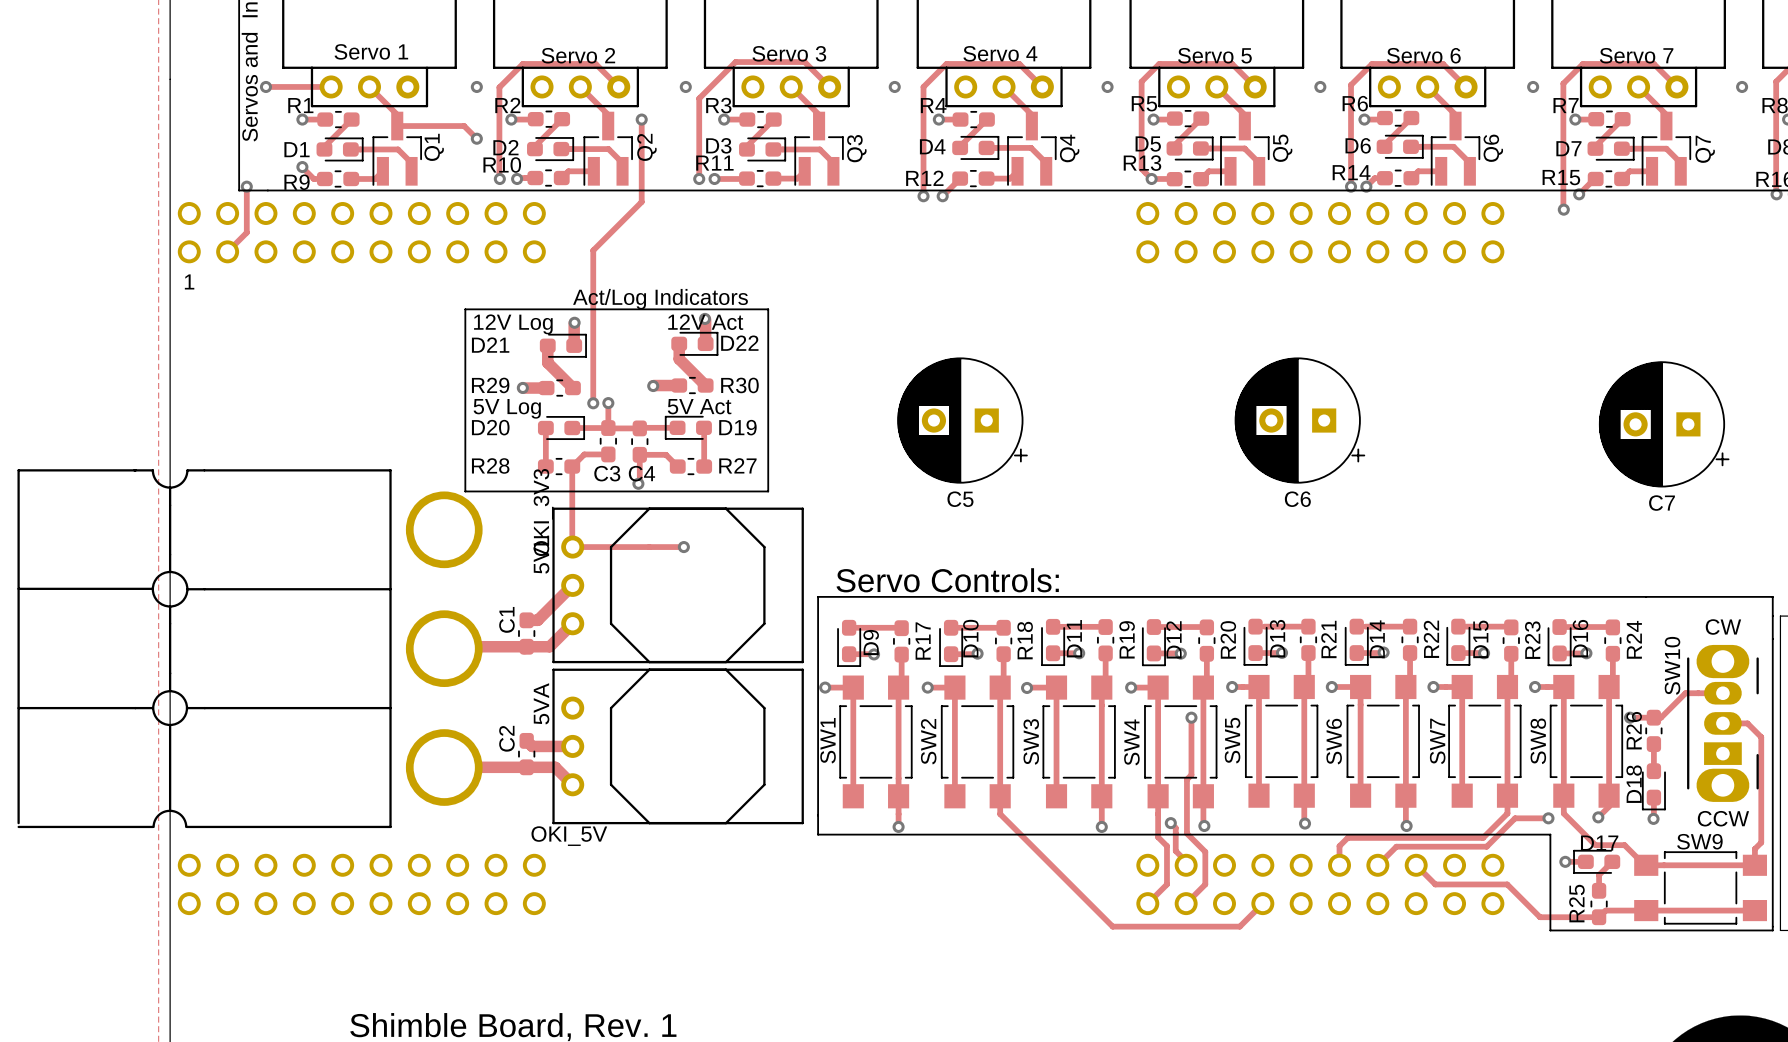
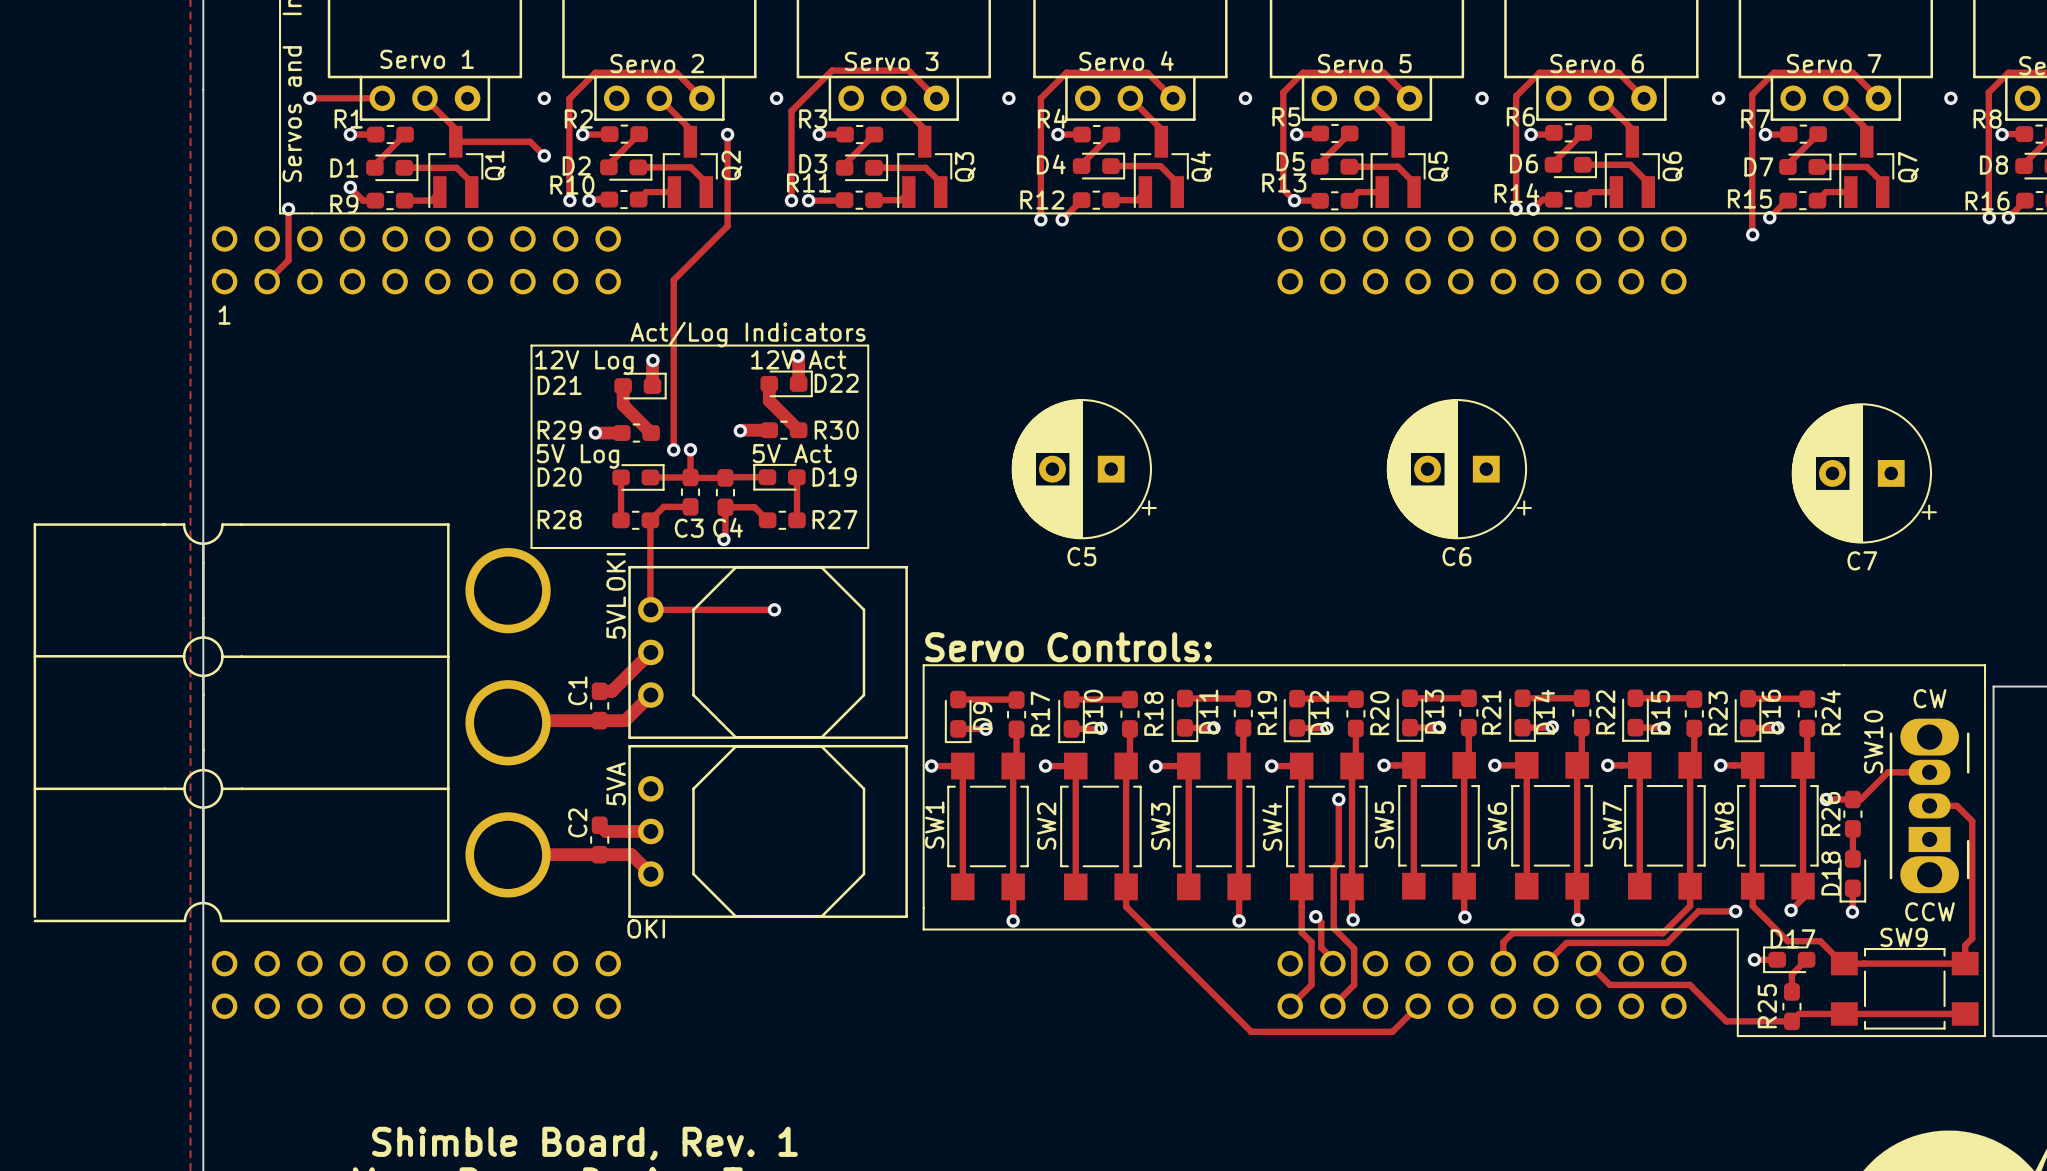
part value: OKI_3V3 (543, 512) -> OKI (616, 571)
part value: OKI_5V (569, 836) -> OKI (646, 928)

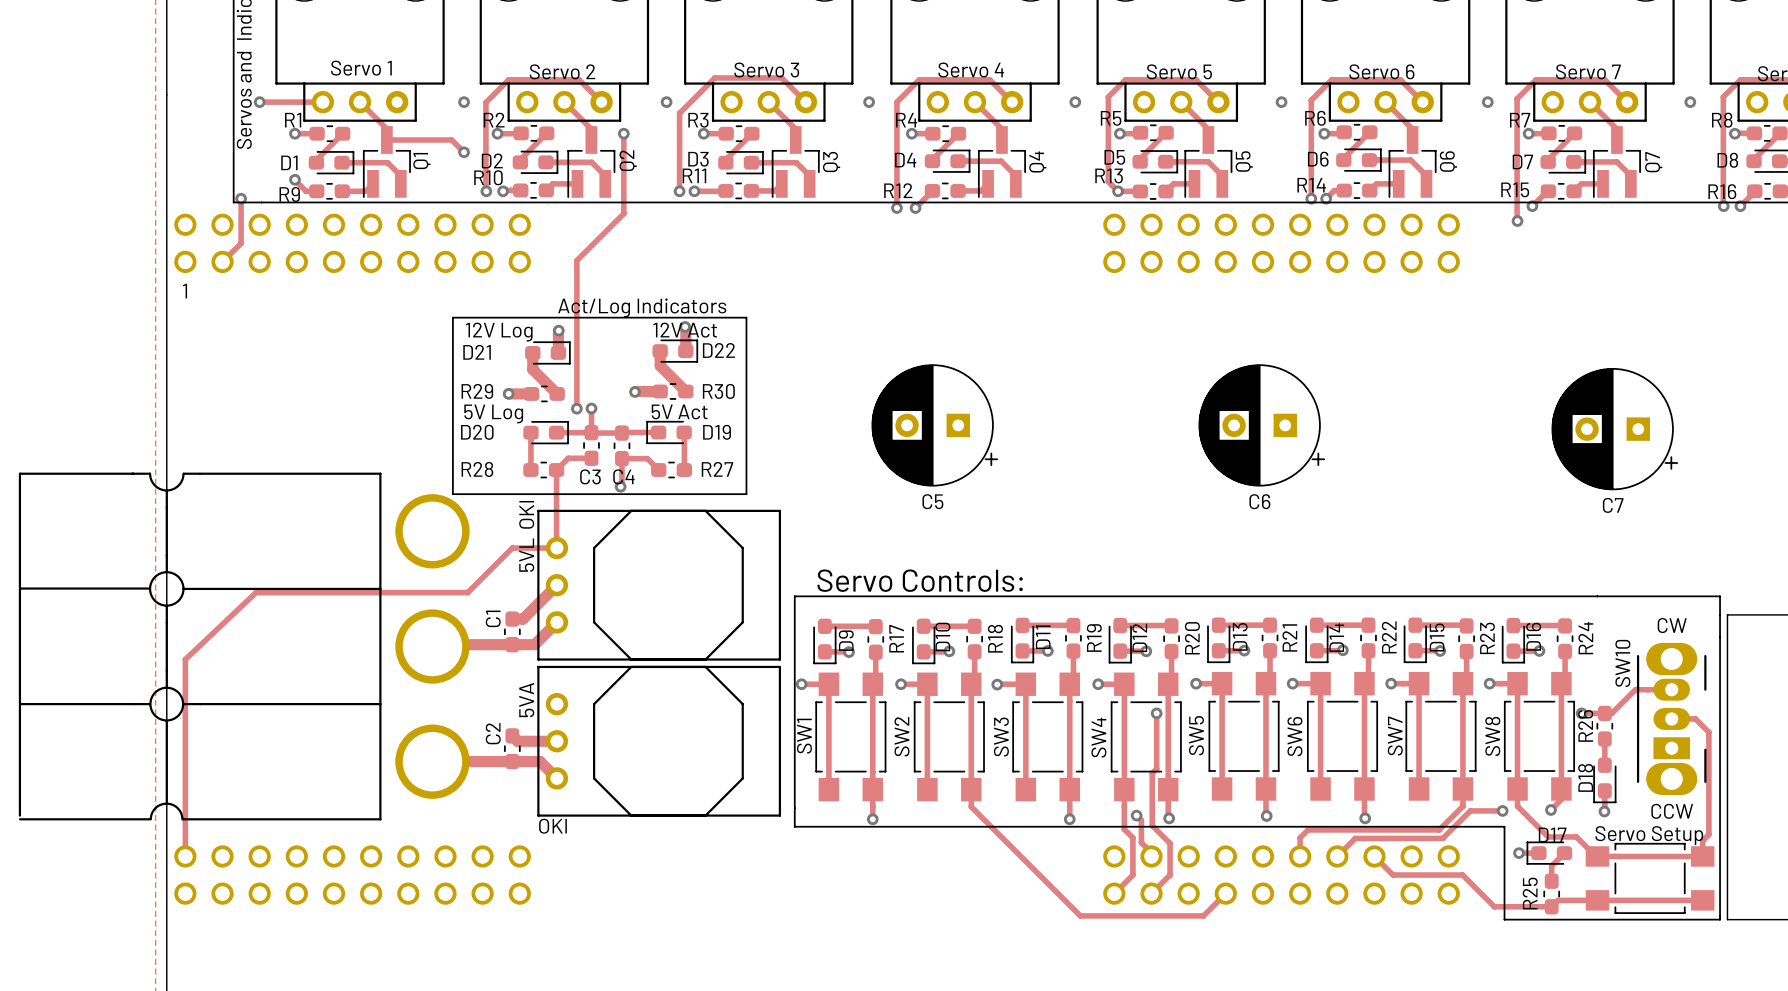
track: (650, 609) (774, 609) -> (556, 548) (512, 548) (467, 592) (255, 592) (185, 659) (185, 856)
via: (774, 609) -> none
SW9 name: SW9 (1904, 937) -> Servo Setup (1649, 835)

